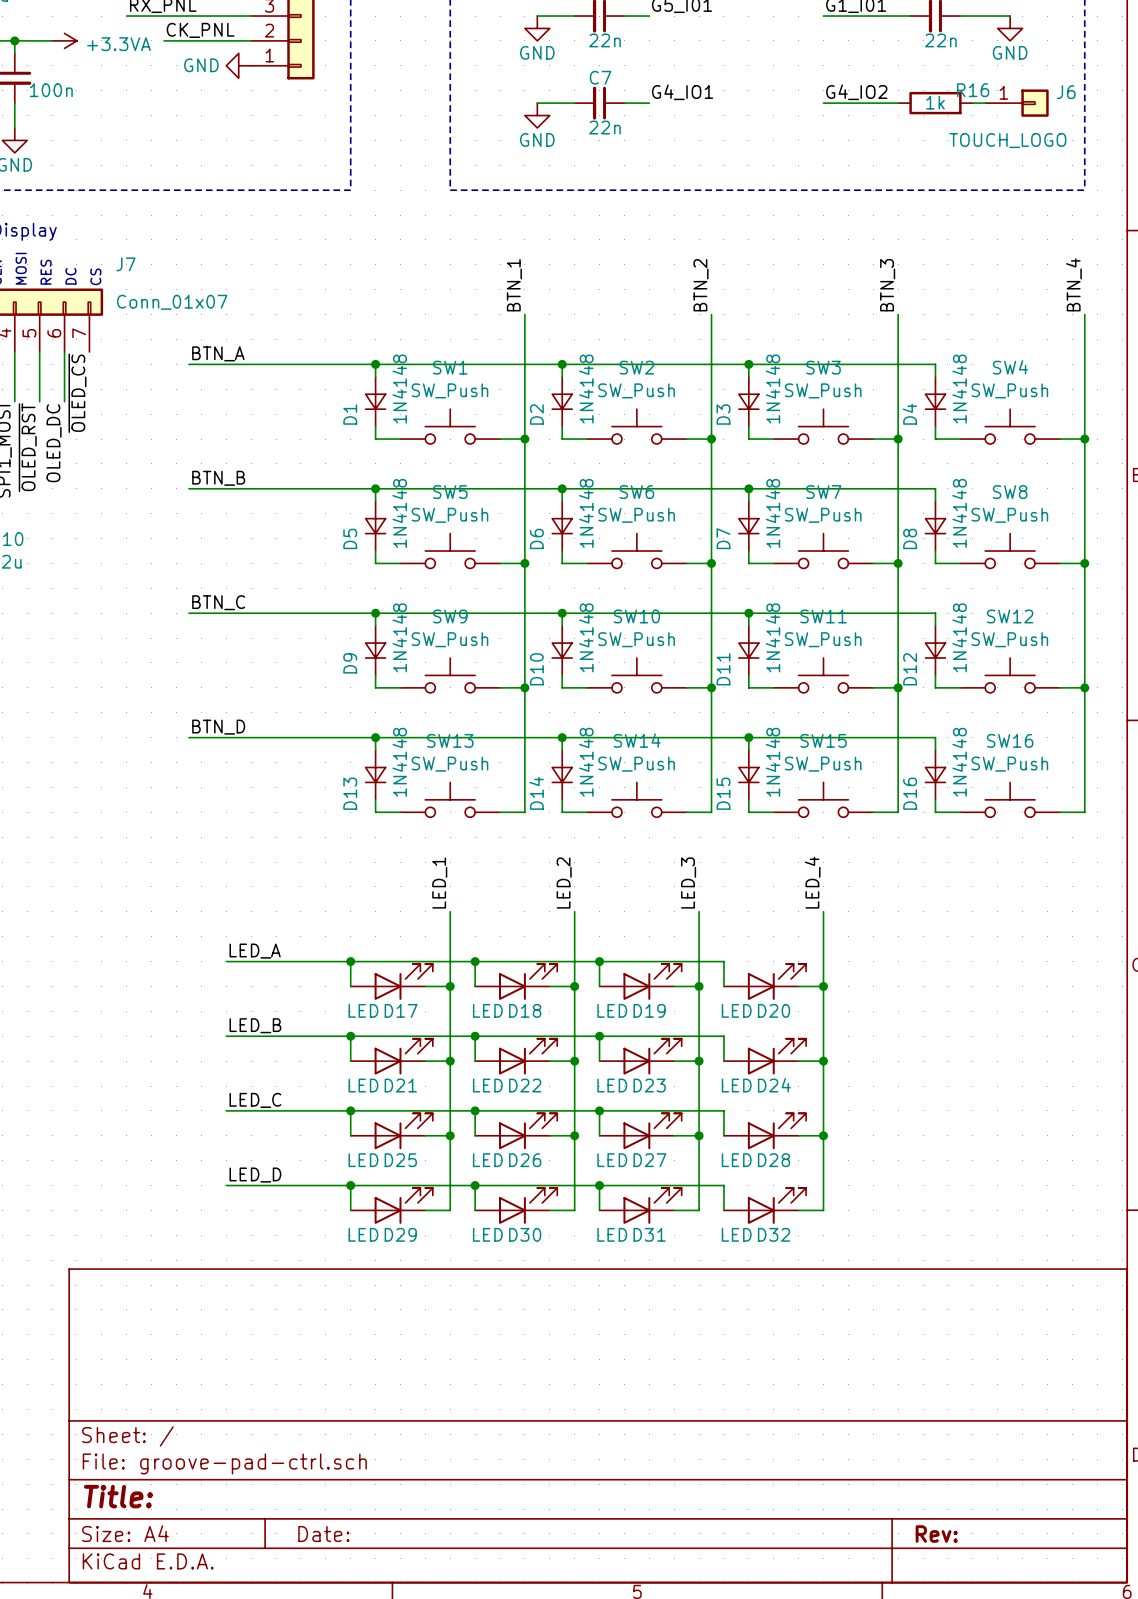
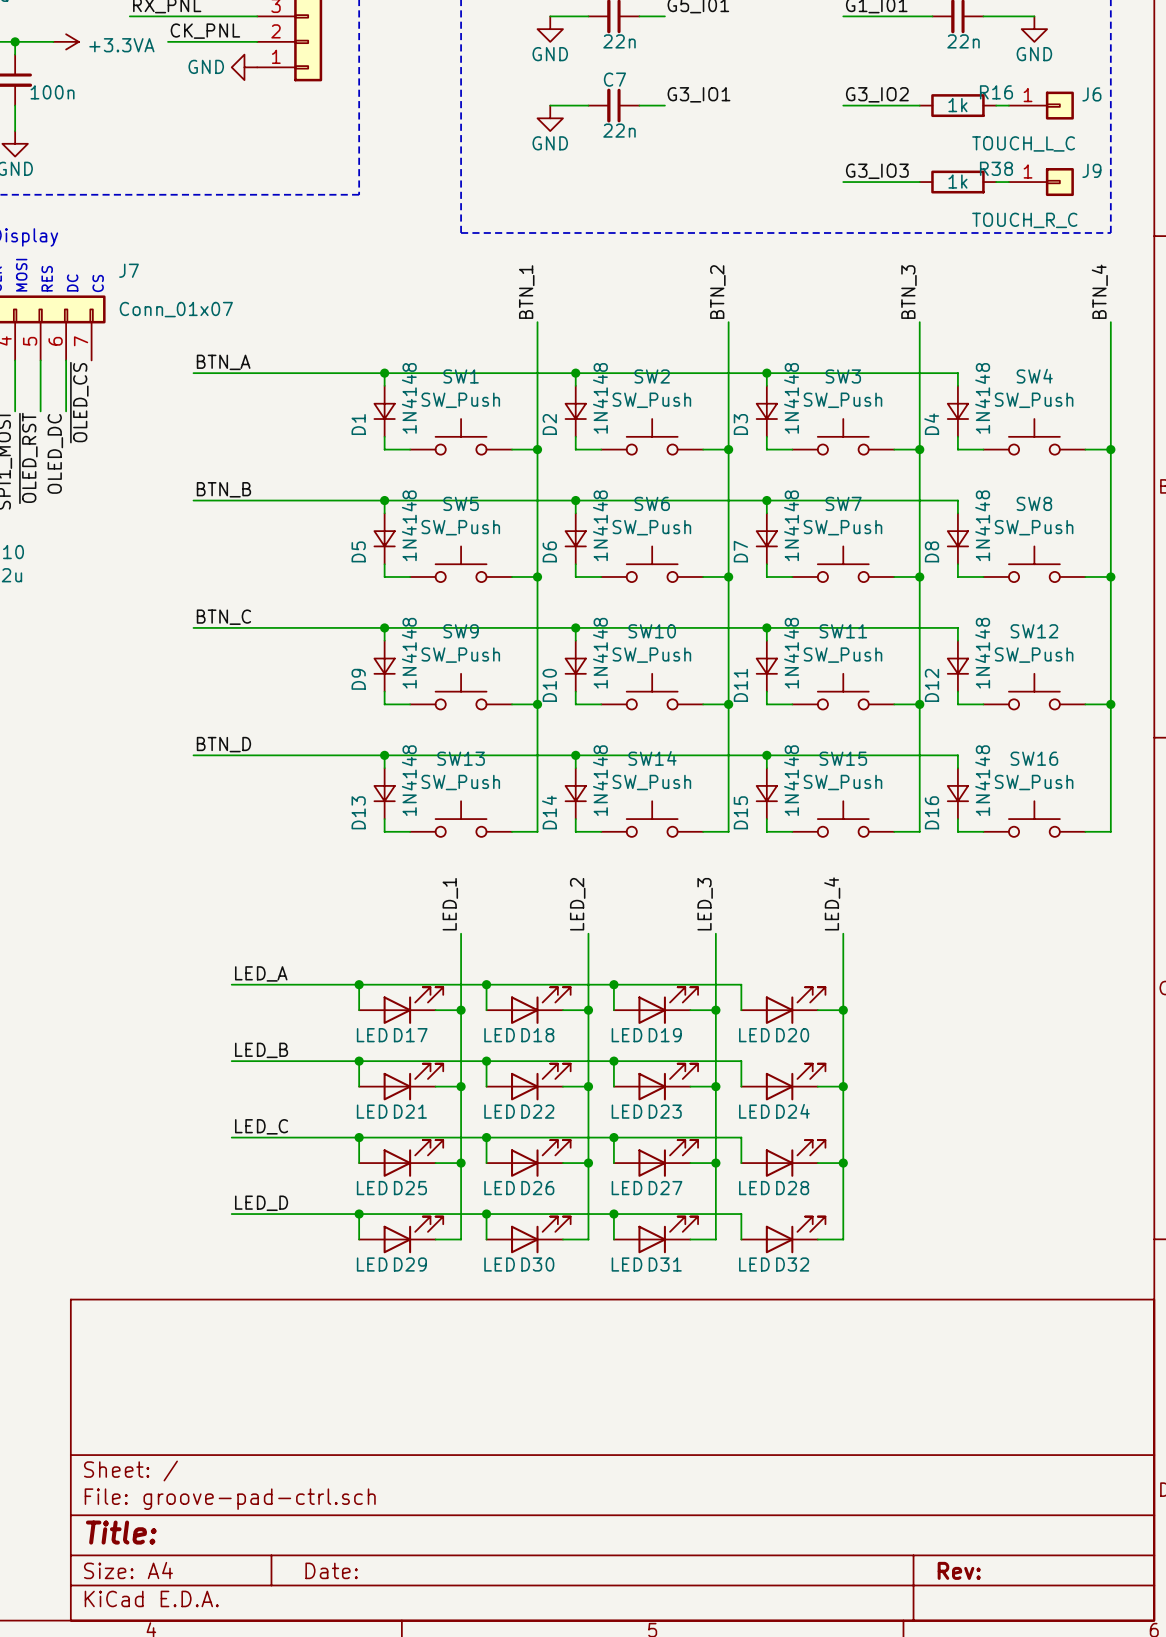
label: G4_IO1 (682, 92) -> G3_IO1 (698, 94)
label: G4_IO2 (856, 92) -> G3_IO2 (877, 94)
J6 value: TOUCH_LOGO (1007, 140) -> TOUCH_L_C (1023, 143)
label: none -> G3_IO3 (877, 171)
wire: none -> (843, 182) (919, 182)
R38: none -> 1k (957, 182)
wire: none -> (996, 182) (1008, 182)
J9: none -> TOUCH_R_C (1041, 182)
line: (450, 190) (1084, 190) -> (461, 194) (461, 232) (1110, 232) (1110, 194)

